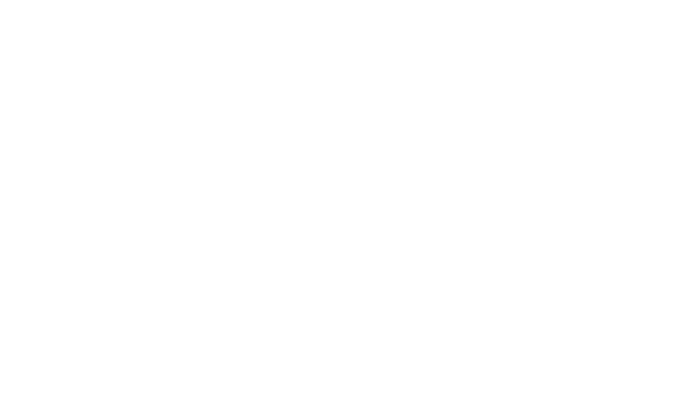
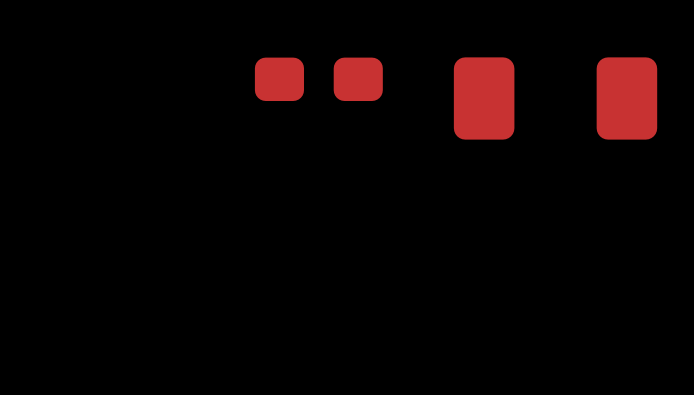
part: none -> (318, 79)
part: none -> (555, 98)

